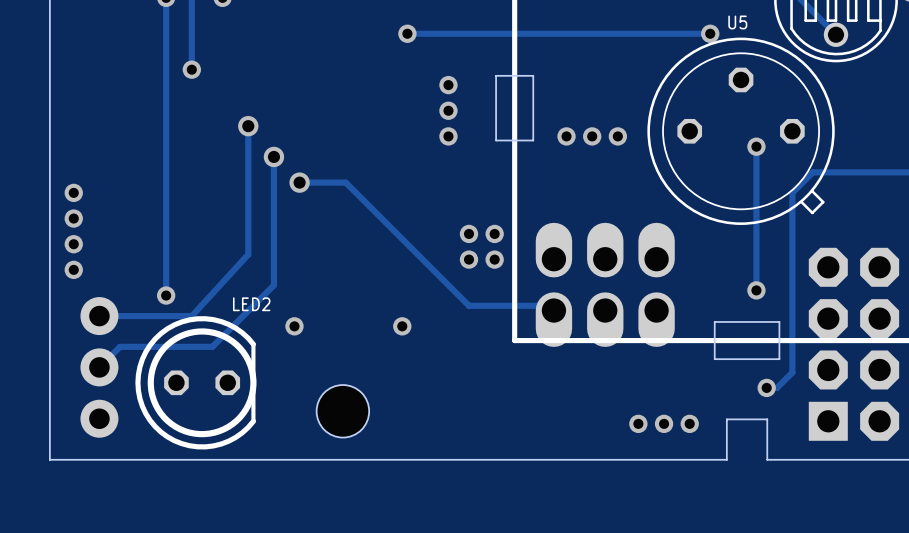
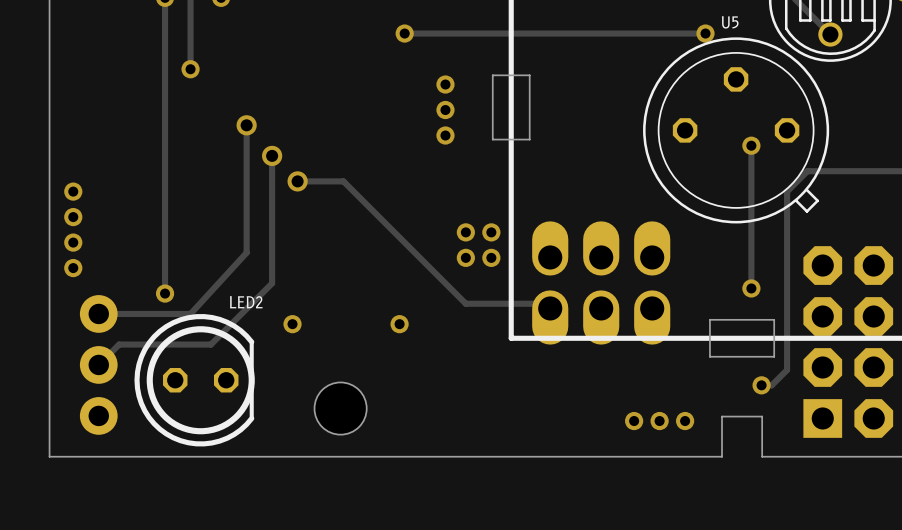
via: (566, 136) -> none
via: (592, 136) -> none
via: (617, 136) -> none

